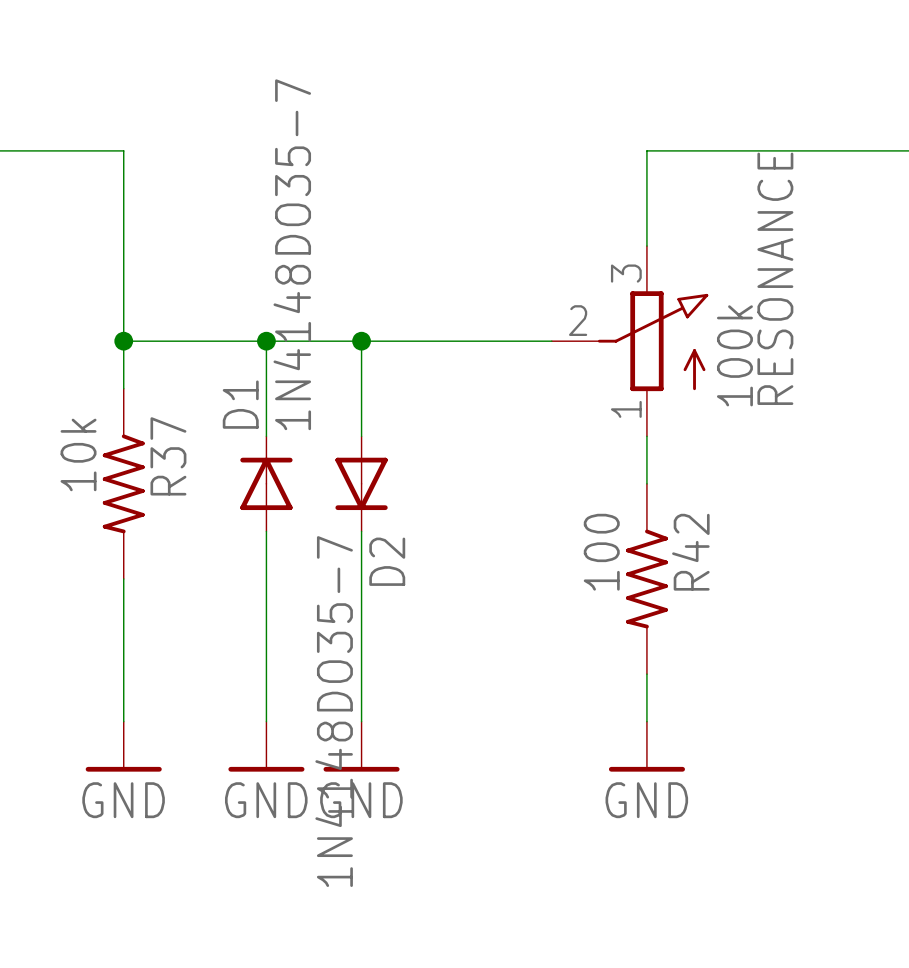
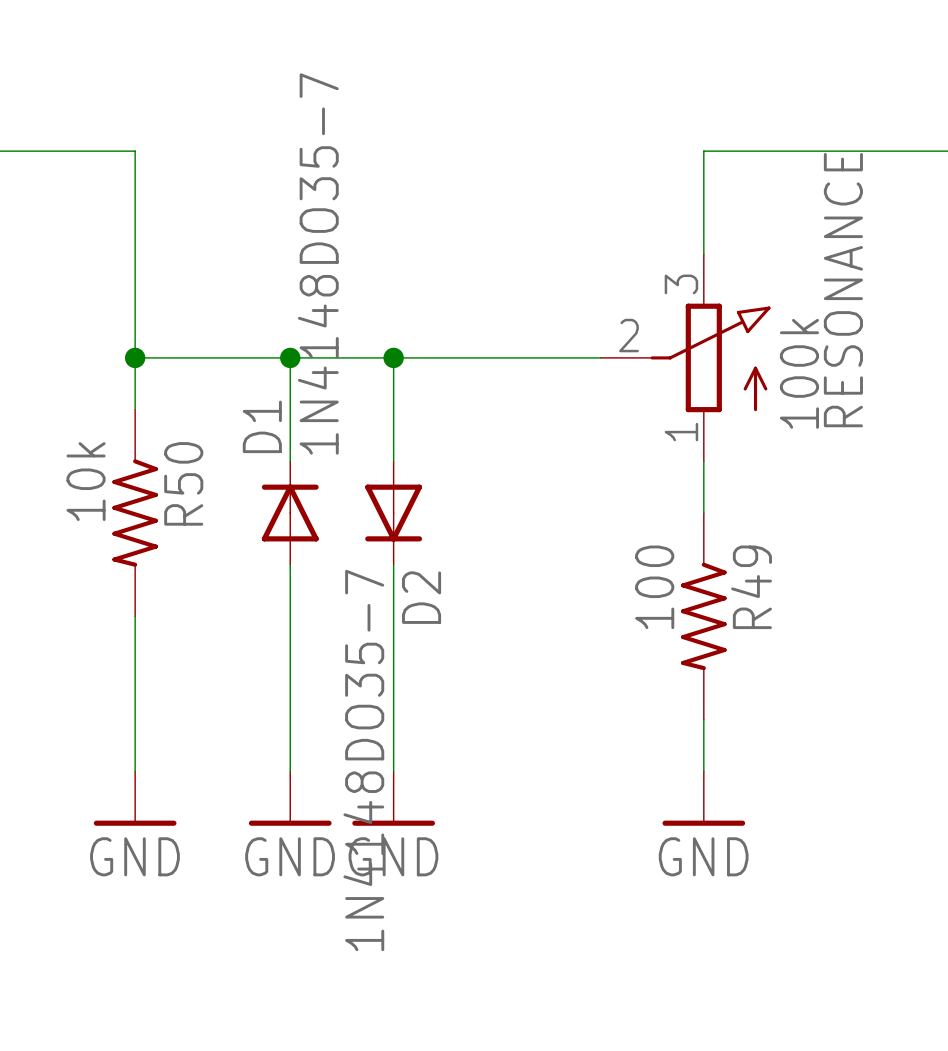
R37 name: R37 (168, 456) -> R50 (183, 483)
R42 name: R42 (690, 552) -> R49 (751, 587)

